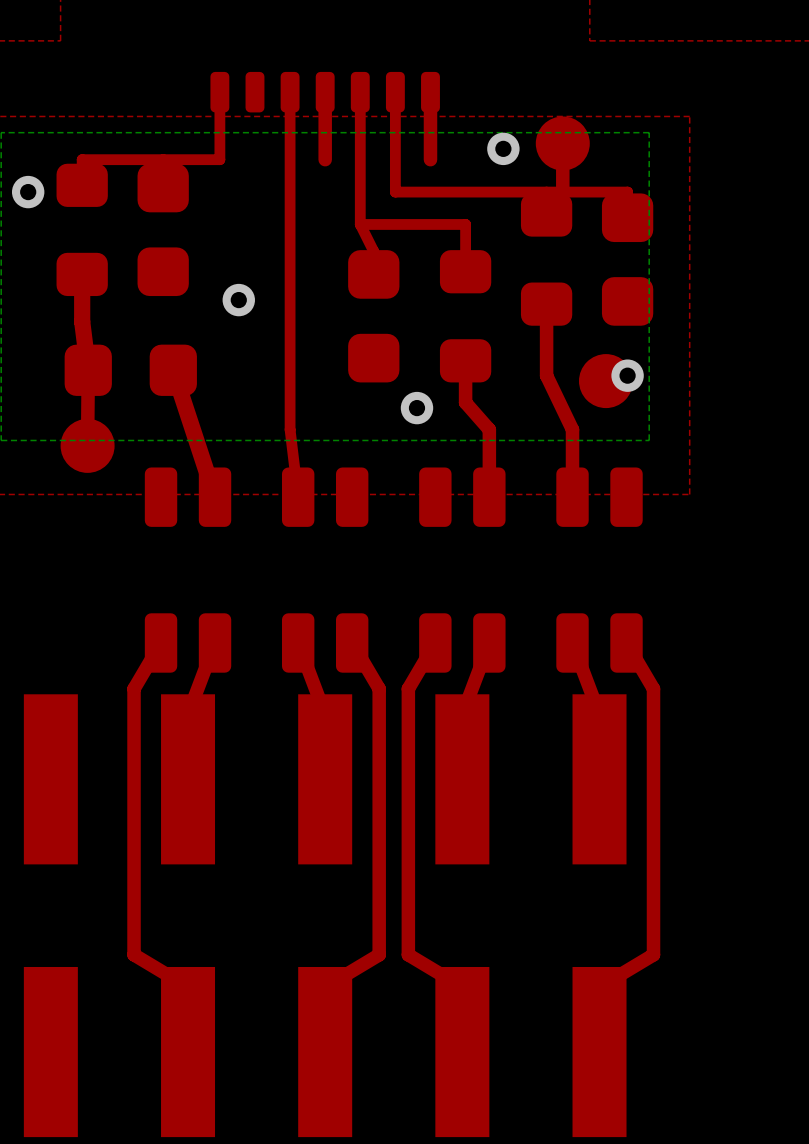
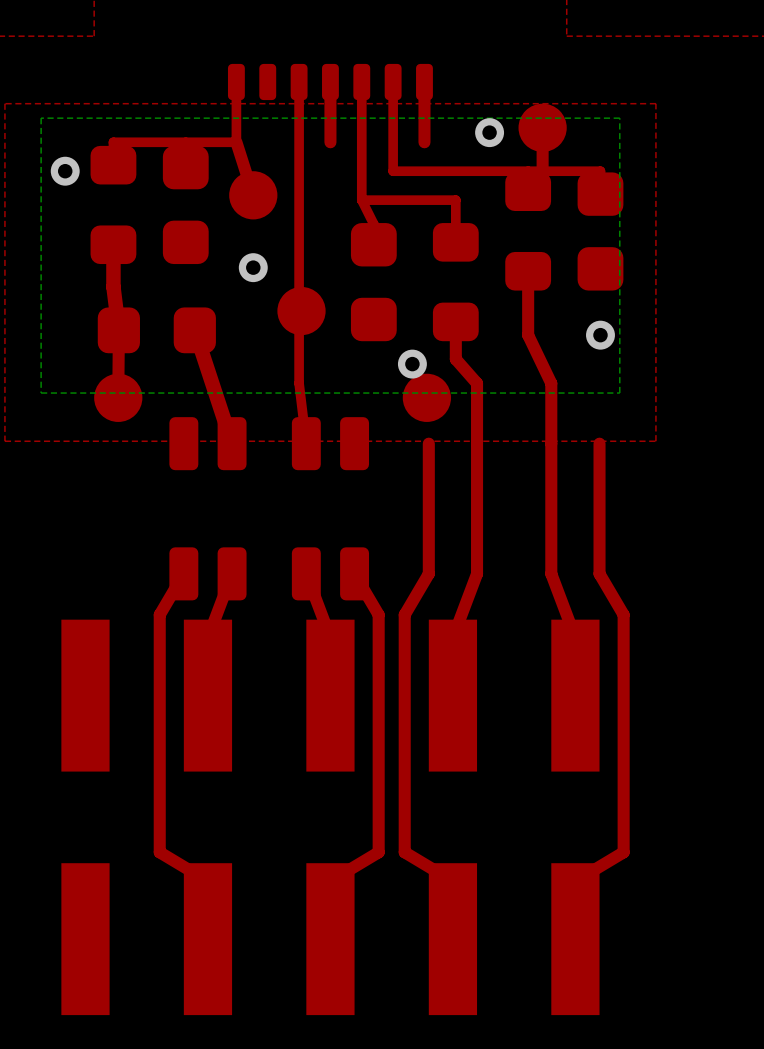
top track: none -> (236, 142) (253, 195)
part: none -> (253, 195)
part: none -> (301, 311)
part: (605, 381) -> none
part: none -> (426, 397)
top track: none -> (428, 443) (428, 573)
top track: none -> (477, 443) (477, 573)
top track: none -> (551, 443) (551, 573)
top track: none -> (599, 443) (599, 573)
part: (462, 570) -> none
part: (599, 570) -> none

